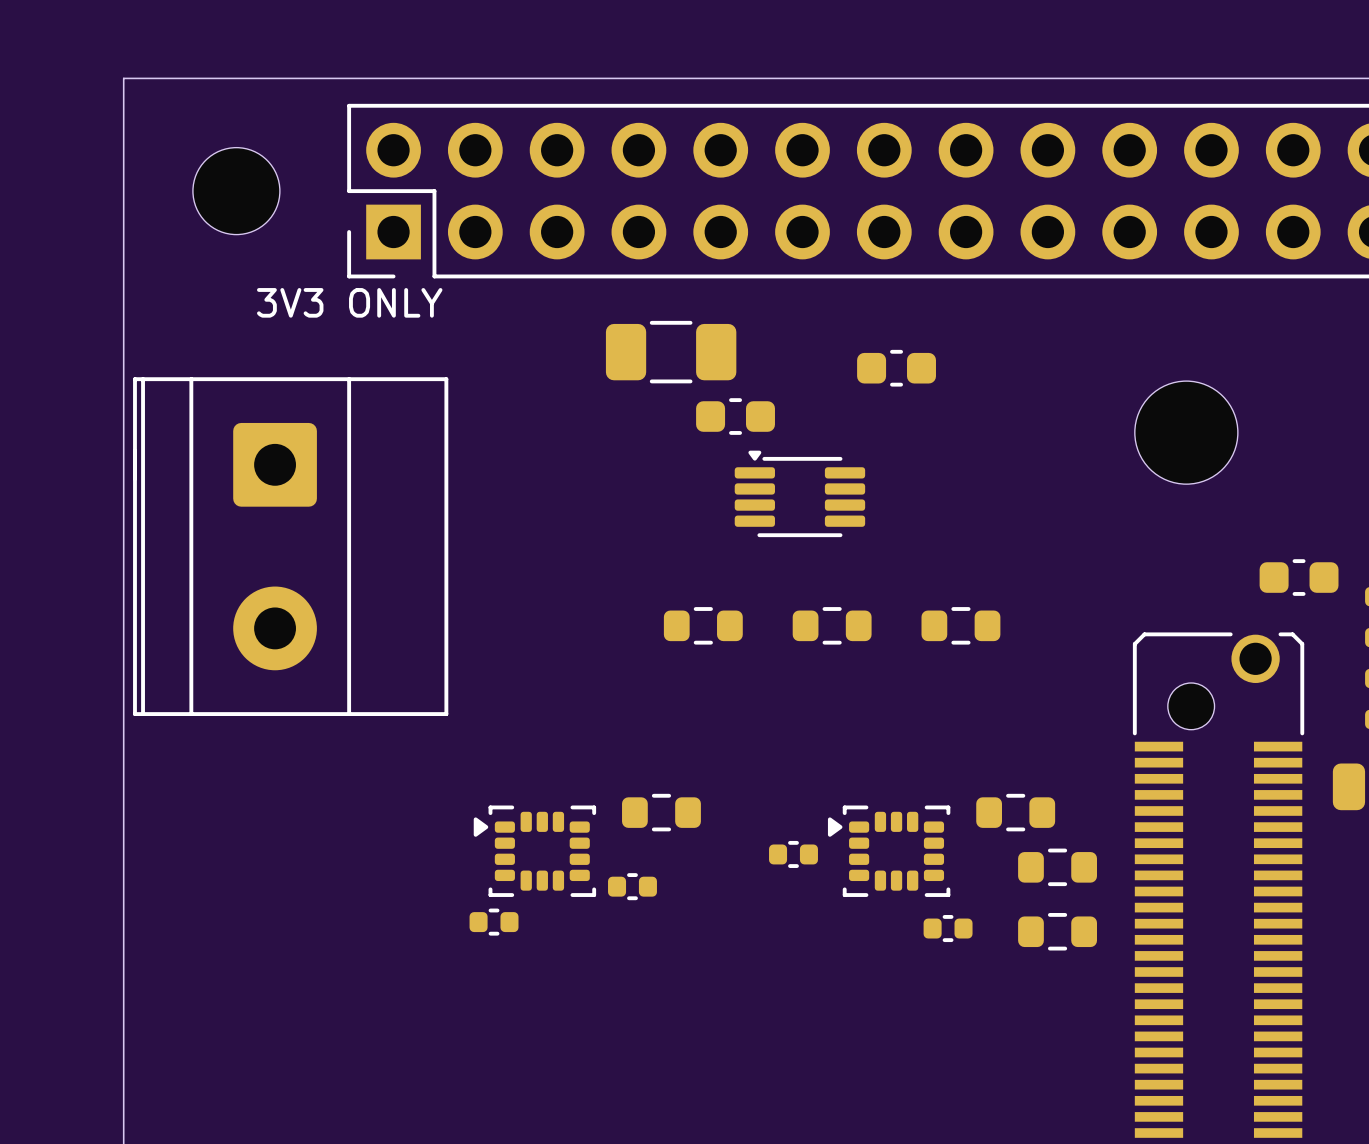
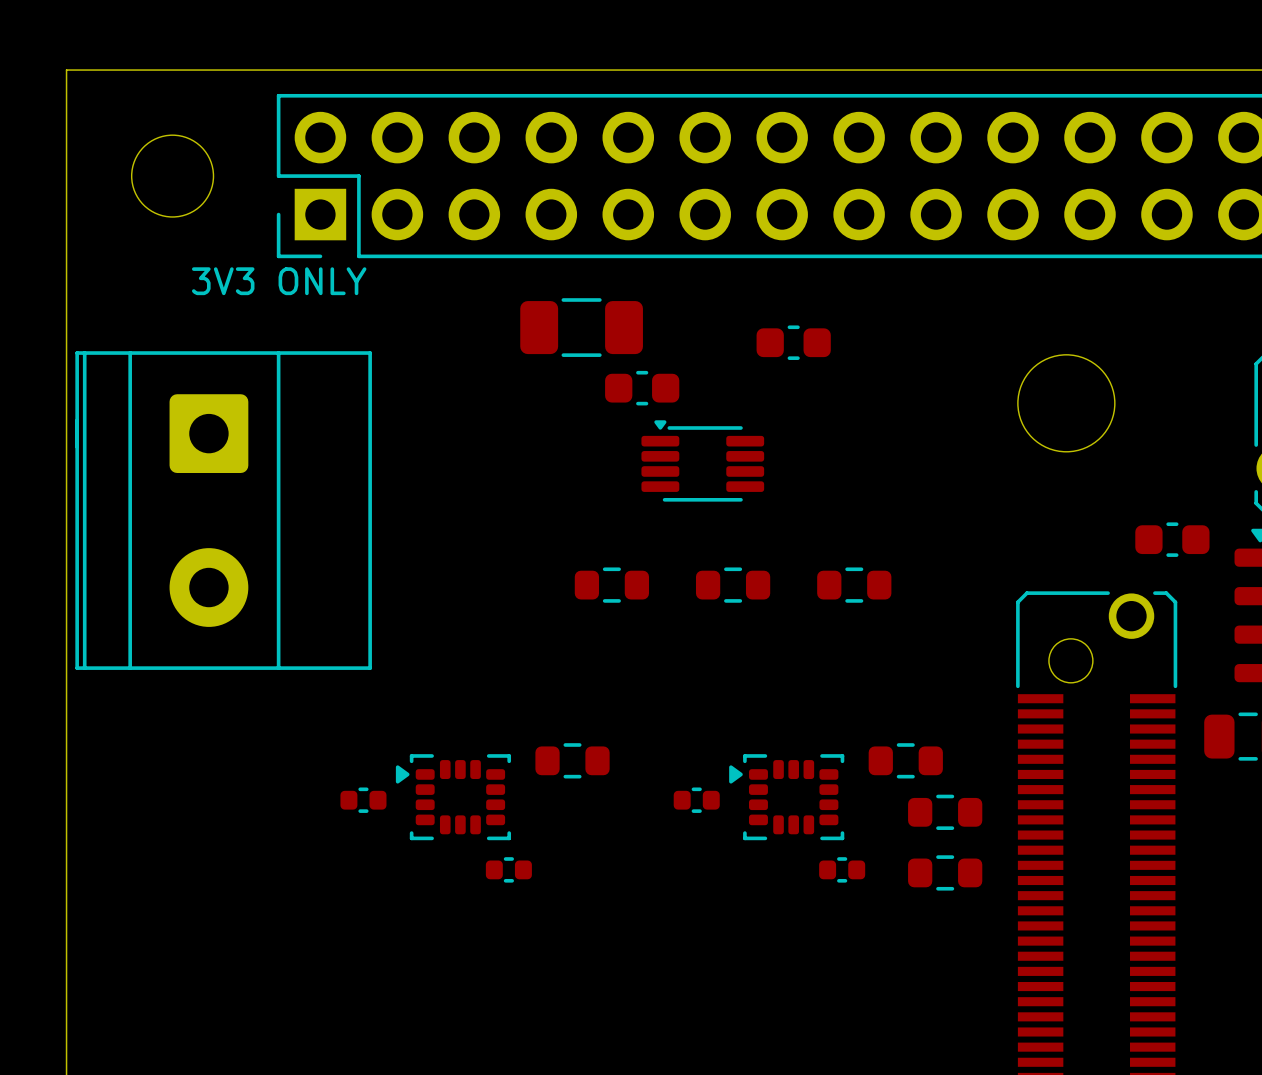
part: none -> (363, 800)
part: (632, 886) -> none
part: (494, 922) -> none
part: none -> (508, 869)

